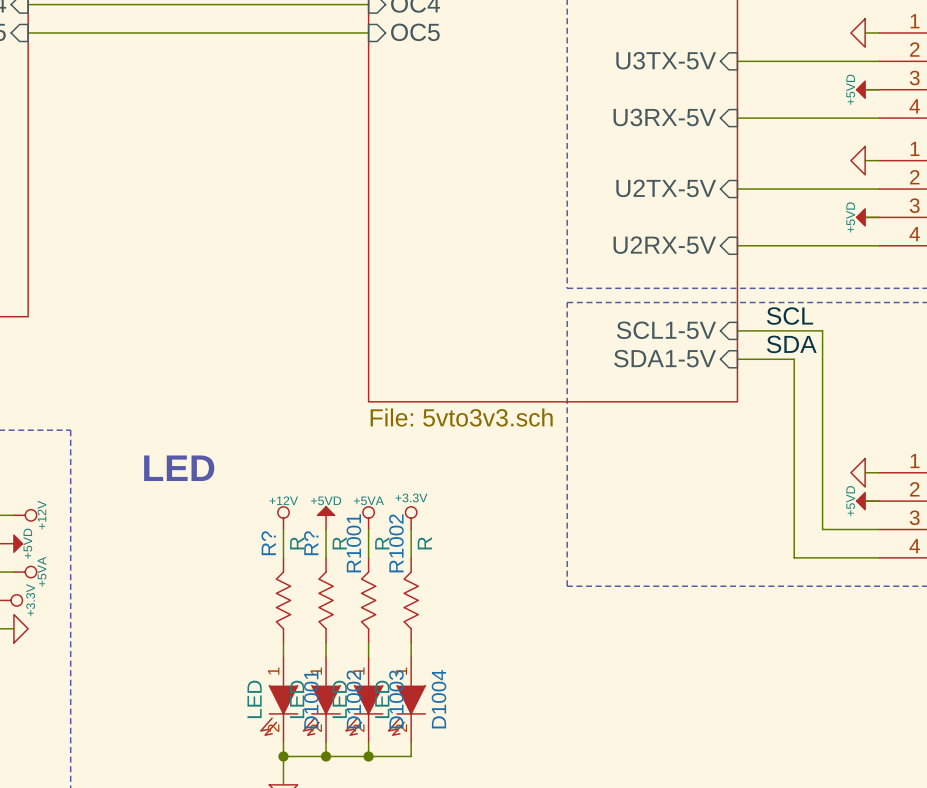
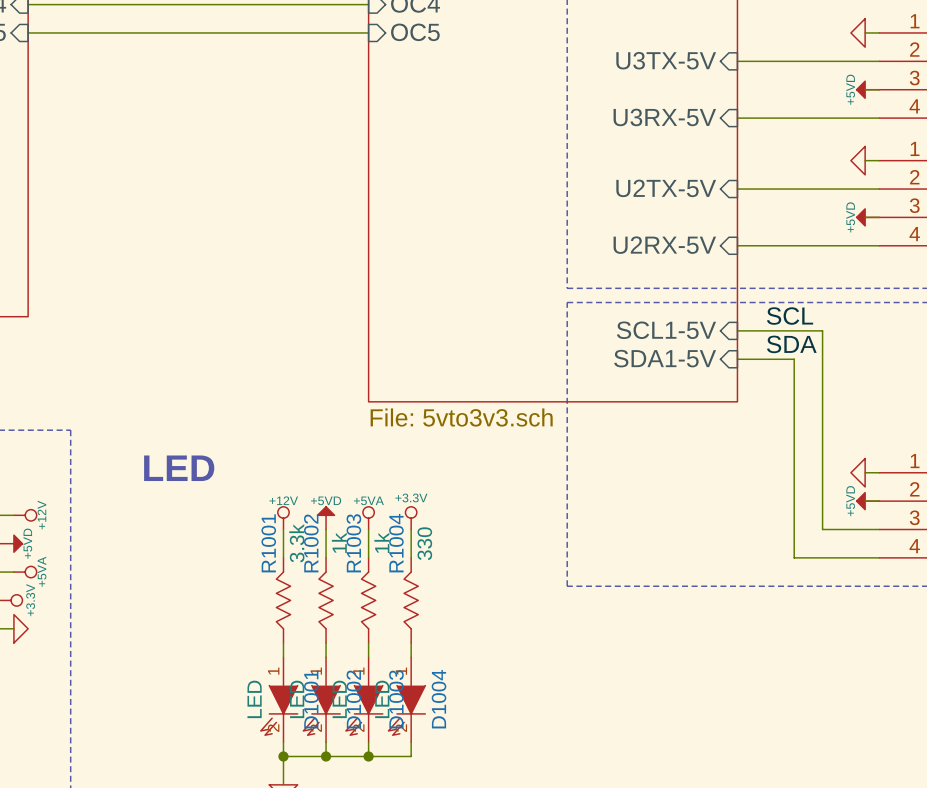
R? name: R? (268, 543) -> R1001 (268, 543)
R? value: R (297, 543) -> 3.3k (296, 543)
R? name: R? (311, 543) -> R1002 (311, 543)
R? value: R (339, 543) -> 1k (339, 542)
R1001 name: R1001 (353, 543) -> R1003 (353, 543)
R1001 value: R (382, 543) -> 1k (381, 542)
R1002 name: R1002 (396, 543) -> R1004 (396, 543)
R1002 value: R (424, 543) -> 330 (424, 543)

